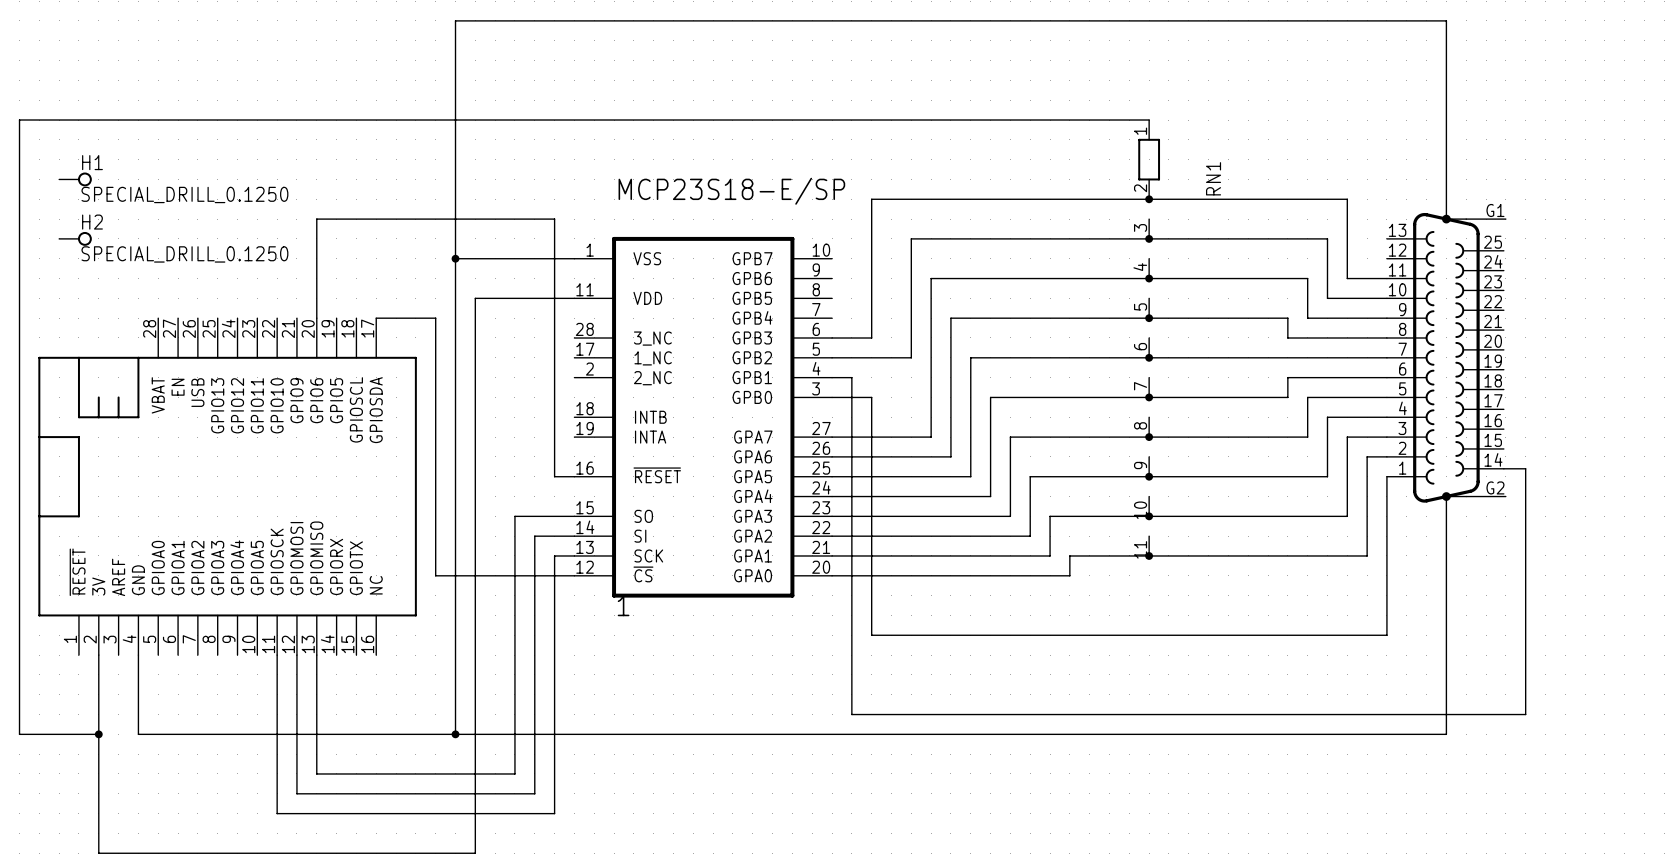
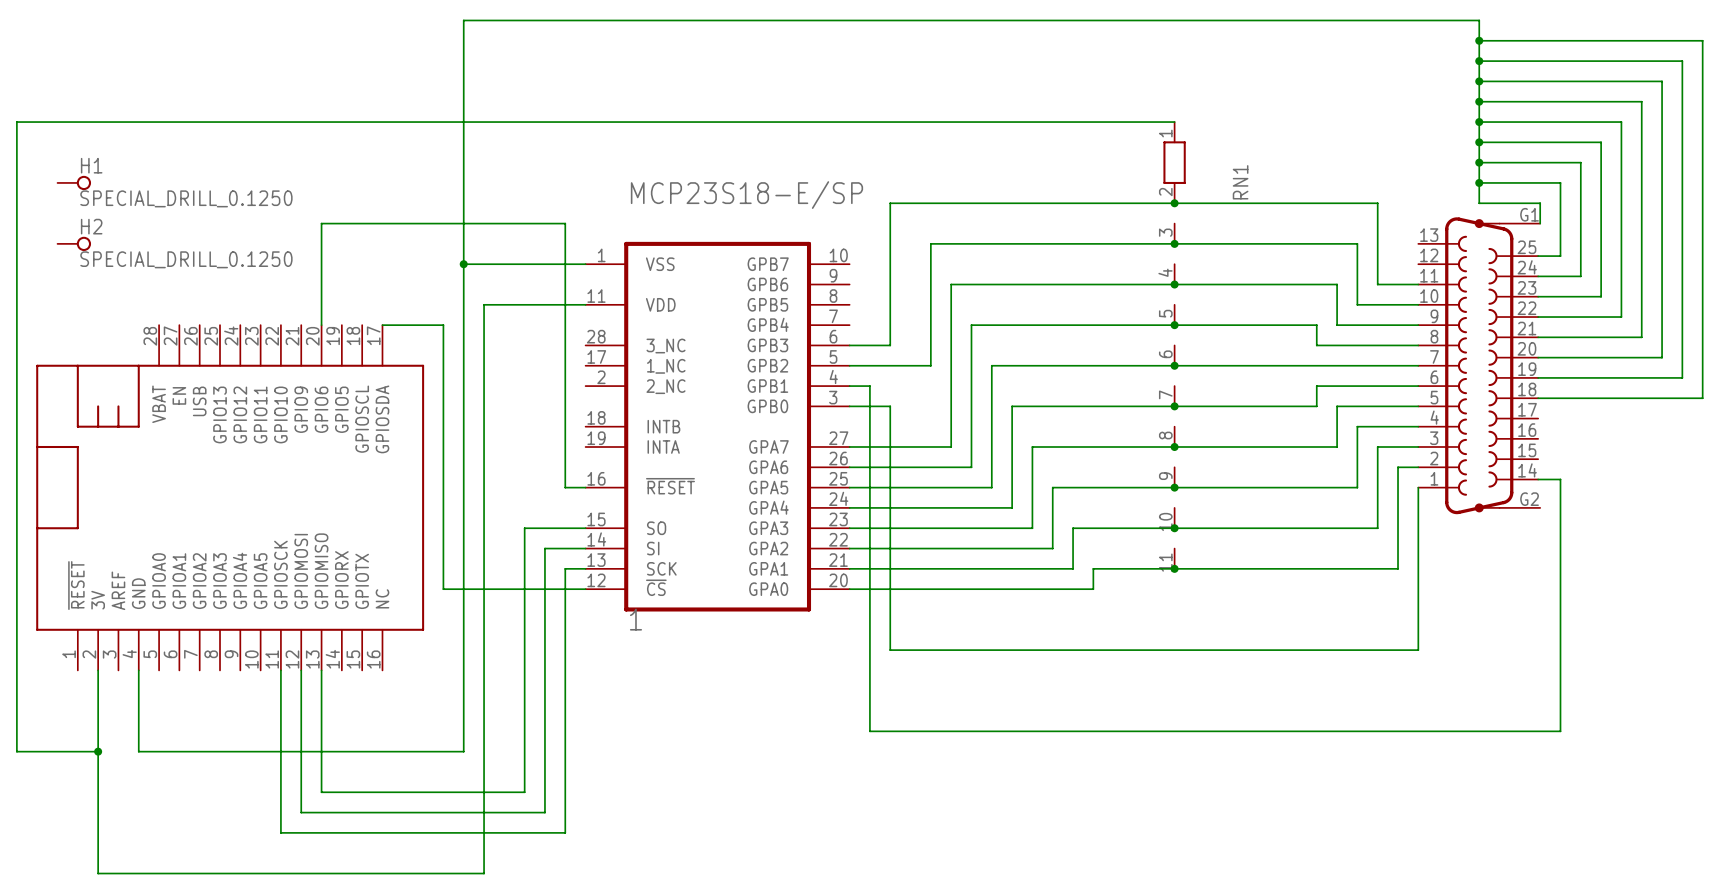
wire: none -> (1479, 40) (1702, 40) (1702, 398) (1538, 398)
junction: none -> (1479, 40)
wire: none -> (1479, 61) (1682, 61) (1682, 377) (1538, 377)
junction: none -> (1479, 61)
wire: none -> (1479, 81) (1662, 81) (1662, 357) (1538, 357)
junction: none -> (1479, 81)
wire: none -> (1479, 101) (1641, 101) (1641, 337) (1538, 337)
junction: none -> (1479, 101)
wire: none -> (1479, 122) (1621, 122) (1621, 317) (1538, 317)
junction: none -> (1479, 122)
wire: none -> (1479, 142) (1601, 142) (1601, 296) (1538, 296)
junction: none -> (1479, 142)
wire: none -> (1479, 162) (1580, 162) (1580, 276) (1538, 276)
junction: none -> (1479, 162)
wire: none -> (1479, 182) (1560, 182) (1560, 256) (1538, 256)
junction: none -> (1479, 182)
wire: (1446, 199) (1446, 219) -> (1479, 203) (1540, 203) (1540, 223)
wire: (1446, 496) (1446, 734) (455, 734) -> none
junction: (455, 734) -> none

